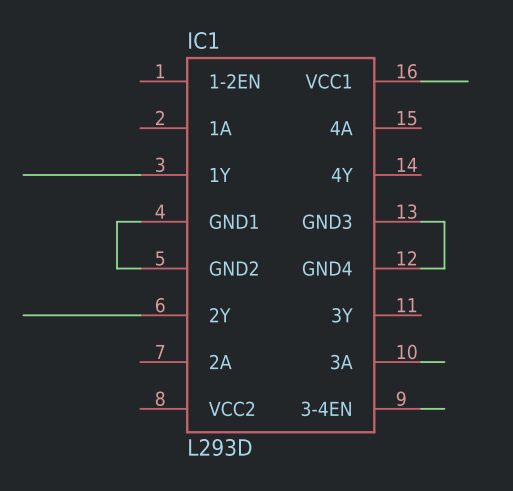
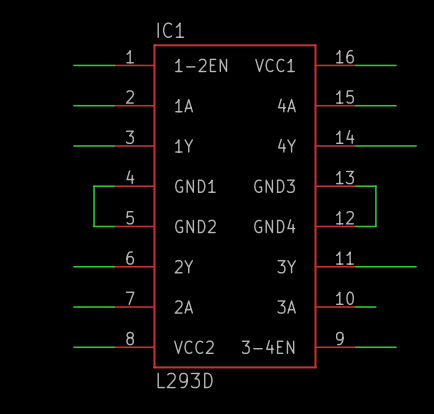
wire: none -> (73, 65) (114, 65)
wire: none -> (73, 105) (114, 105)
wire: none -> (355, 105) (396, 105)
wire: (23, 174) (93, 174) -> none
wire: none -> (355, 145) (416, 145)
wire: (23, 315) (93, 315) -> none
wire: none -> (355, 266) (416, 266)
wire: none -> (73, 307) (114, 307)
wire: none -> (73, 347) (114, 347)
wire: none -> (375, 347) (396, 347)

